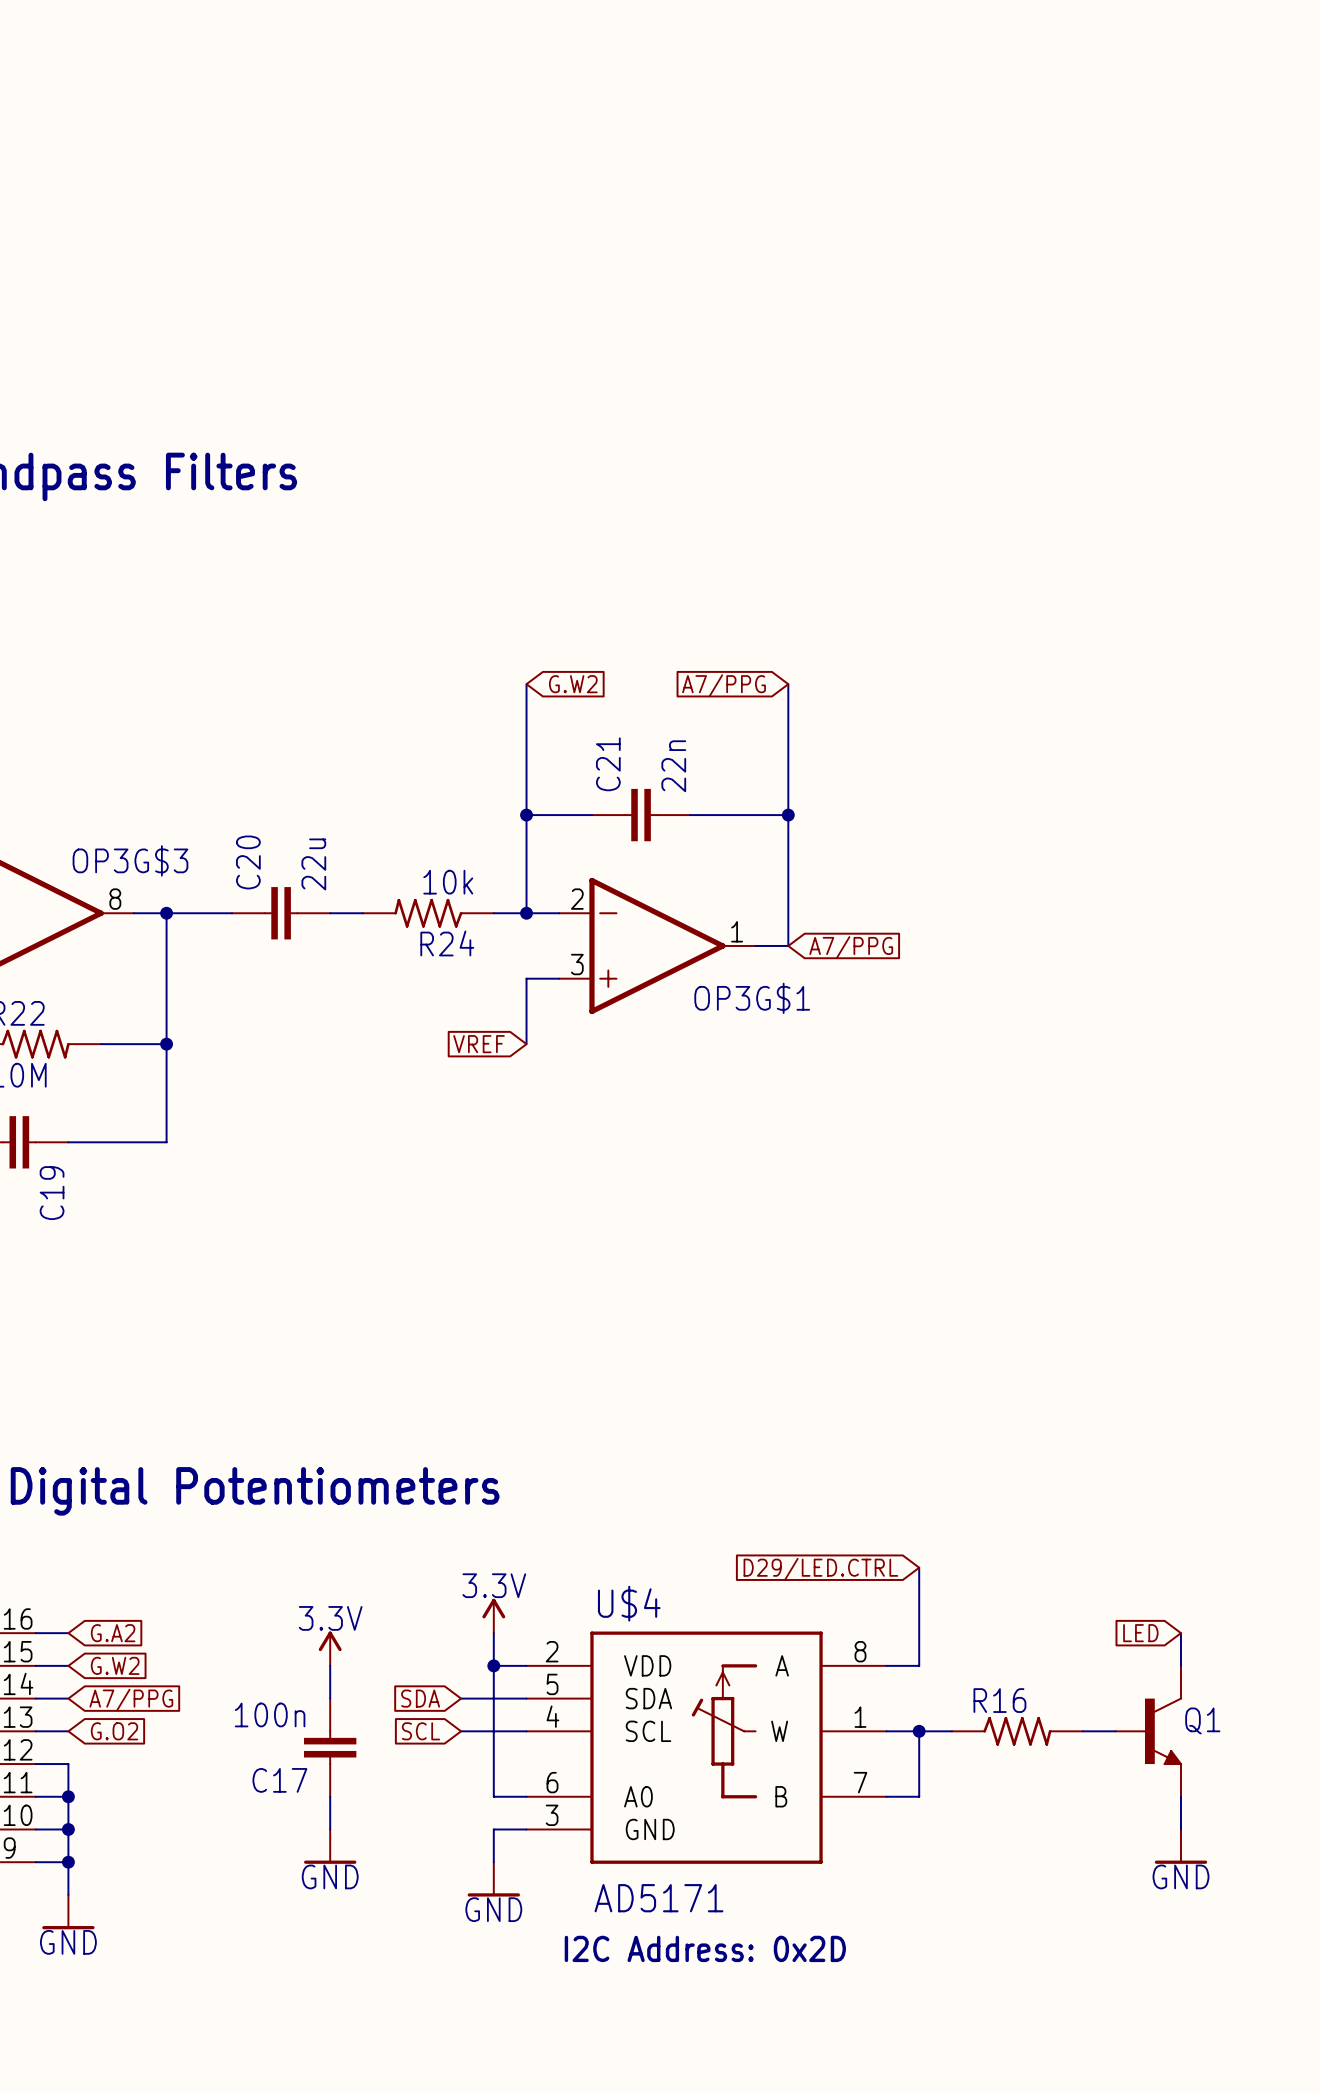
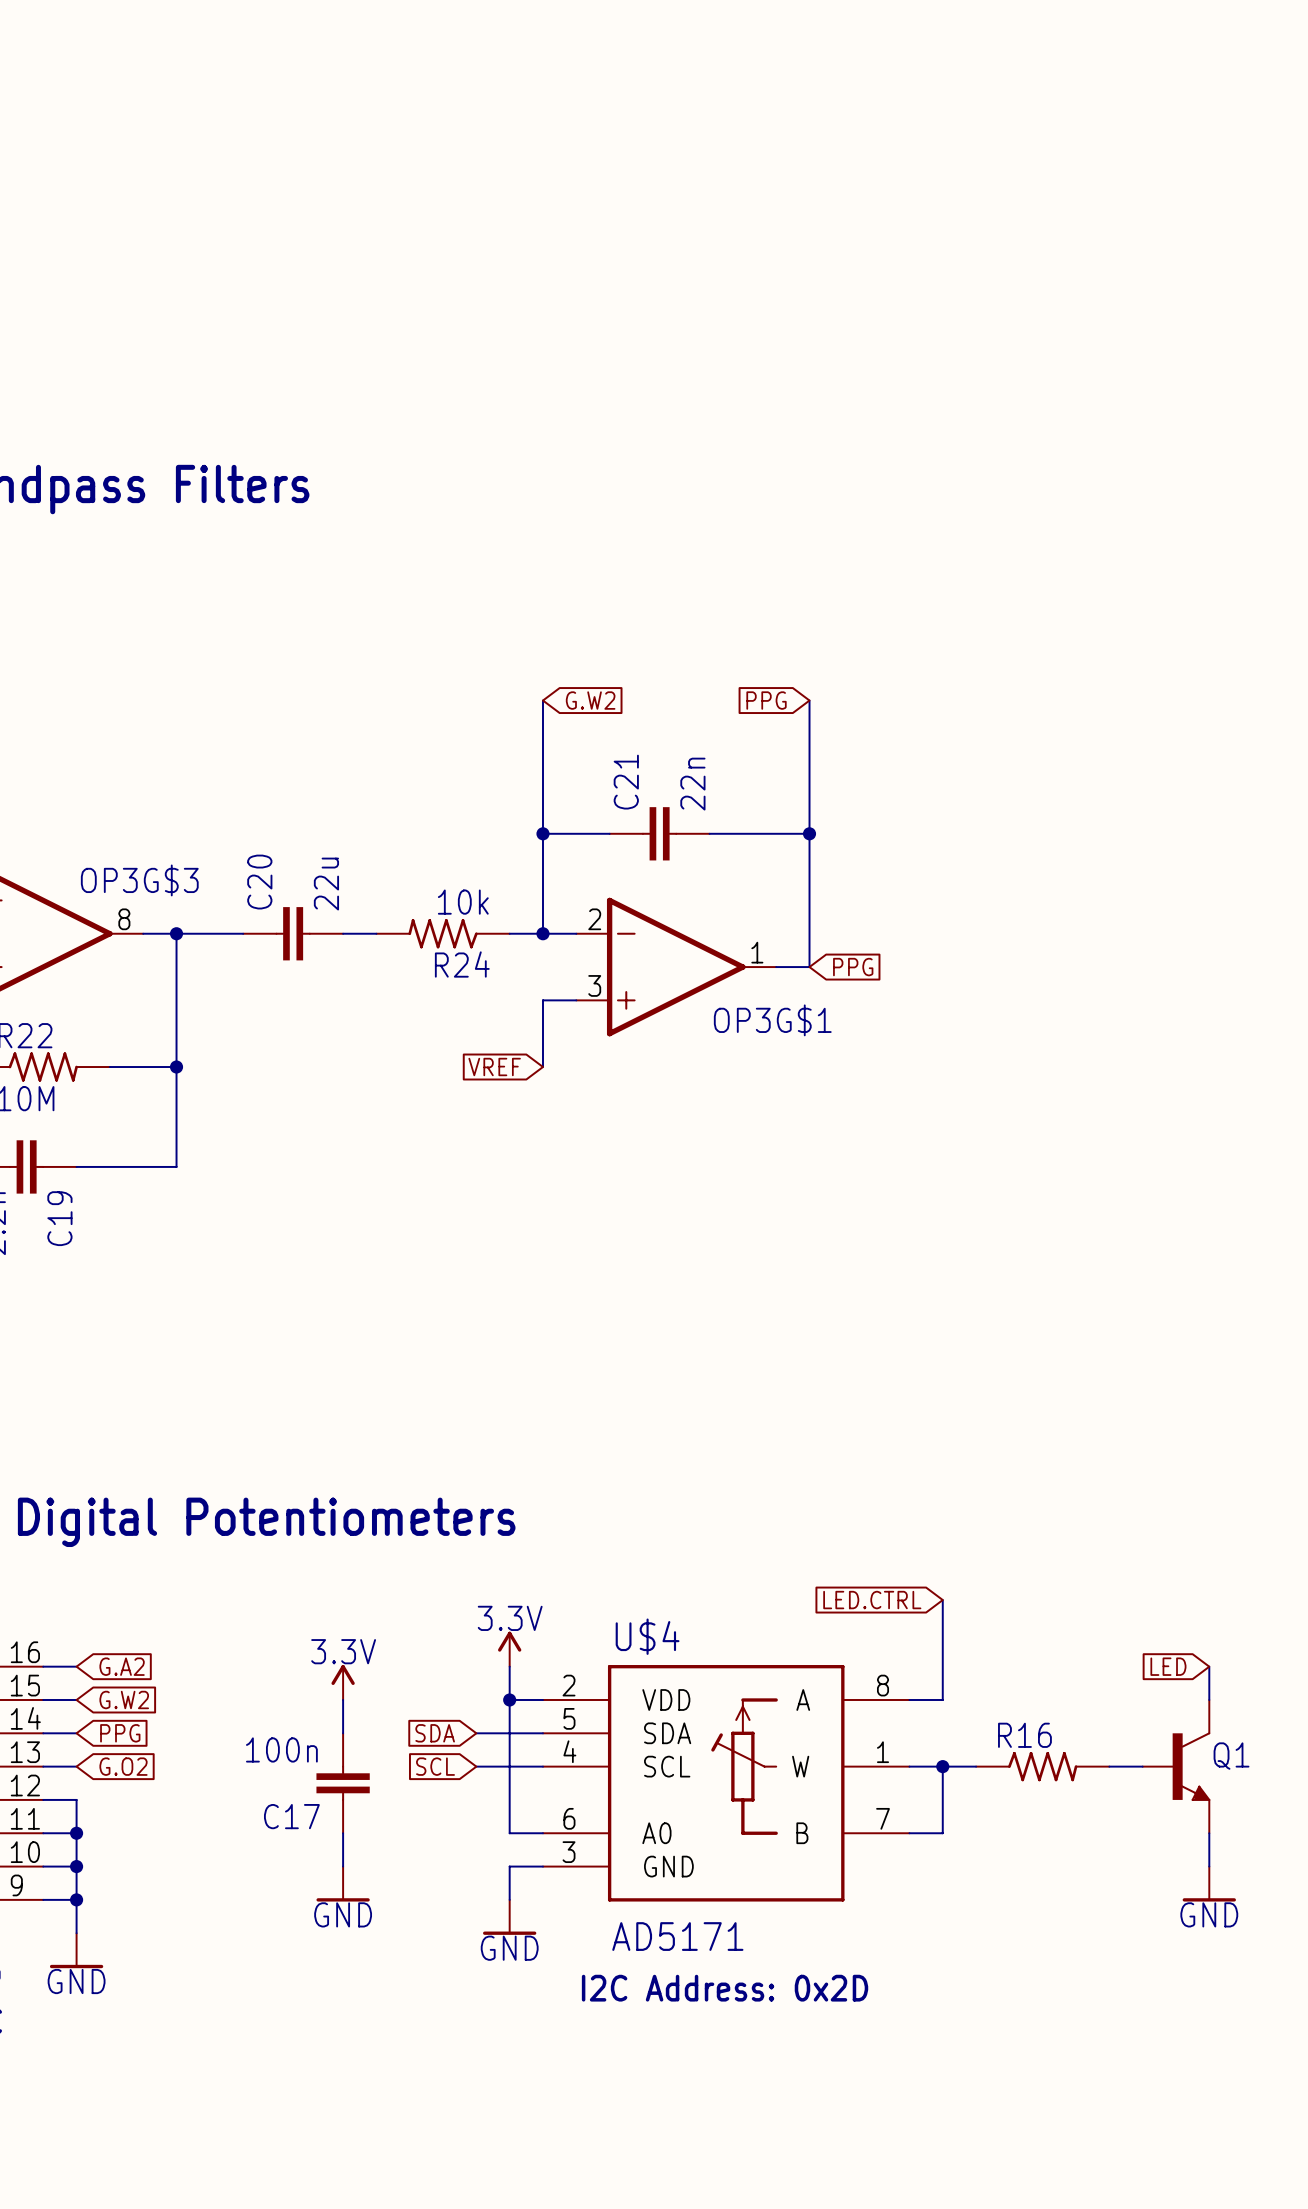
global label: A7/PPG (723, 685) -> PPG (766, 700)
global label: A7/PPG (851, 947) -> PPG (853, 967)
global label: D29/LED.CTRL (820, 1569) -> LED.CTRL (872, 1600)
global label: A7/PPG (131, 1700) -> PPG (120, 1733)

